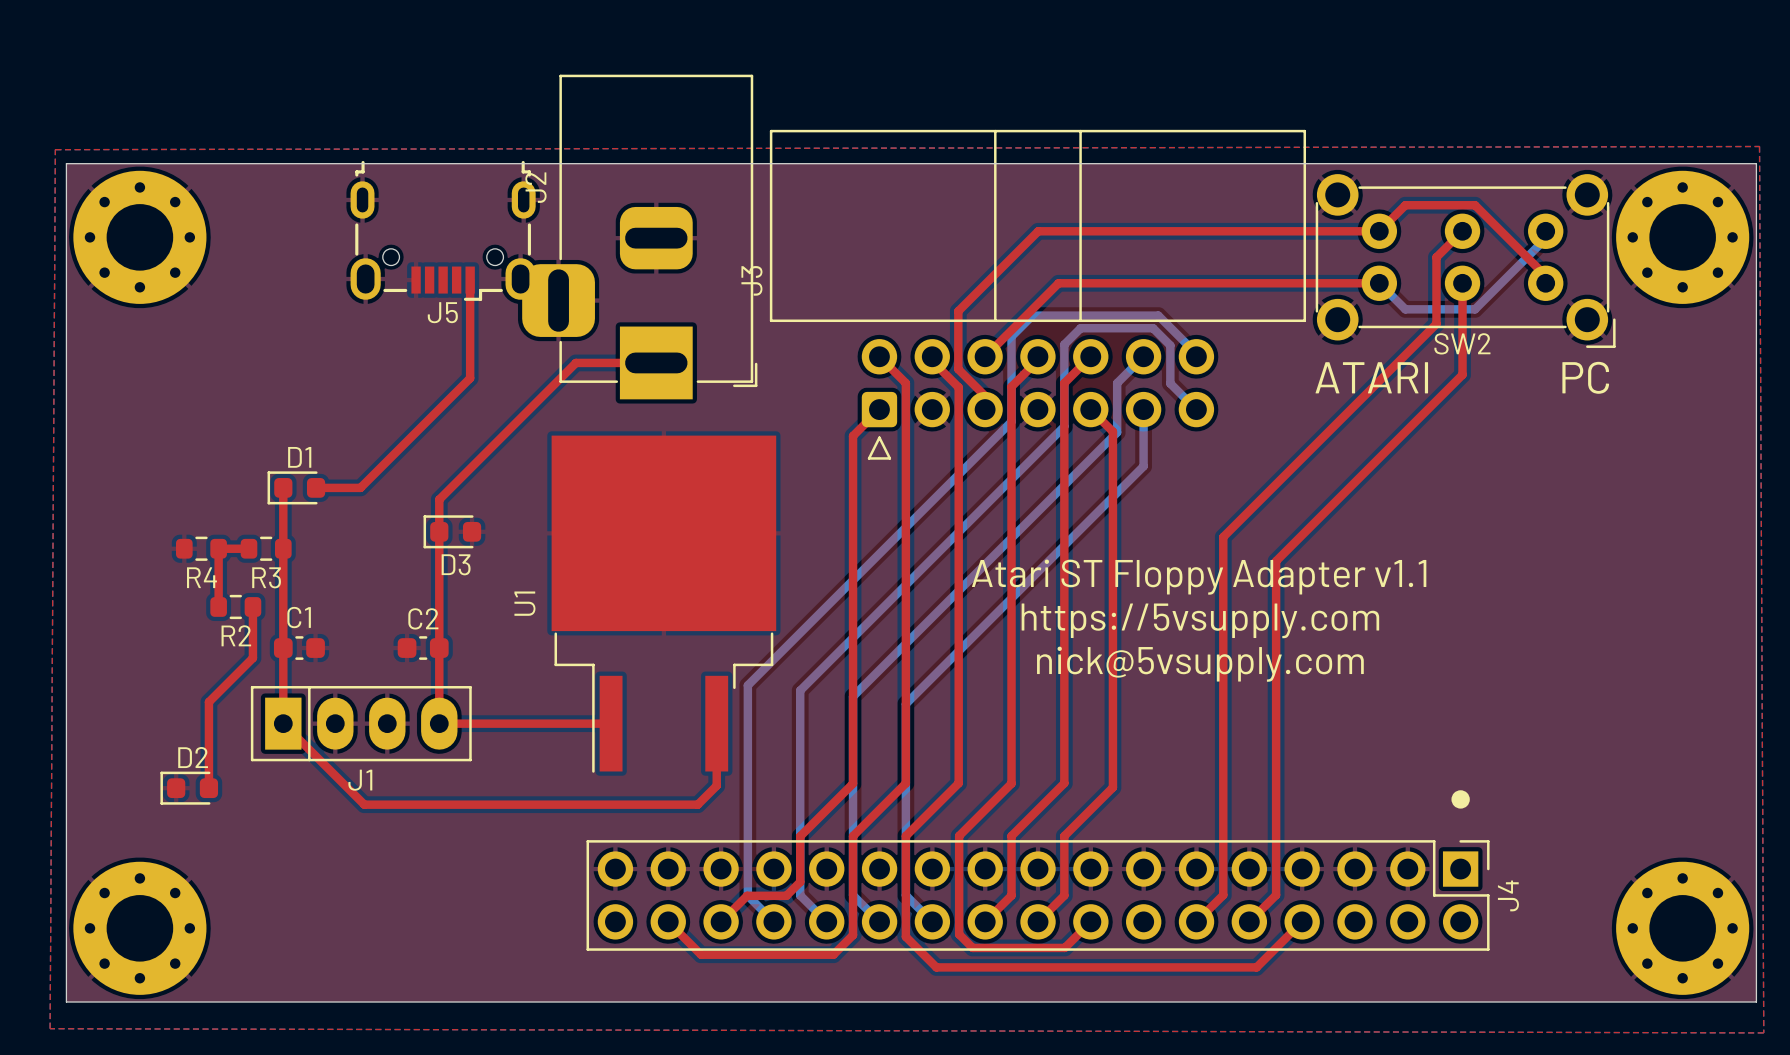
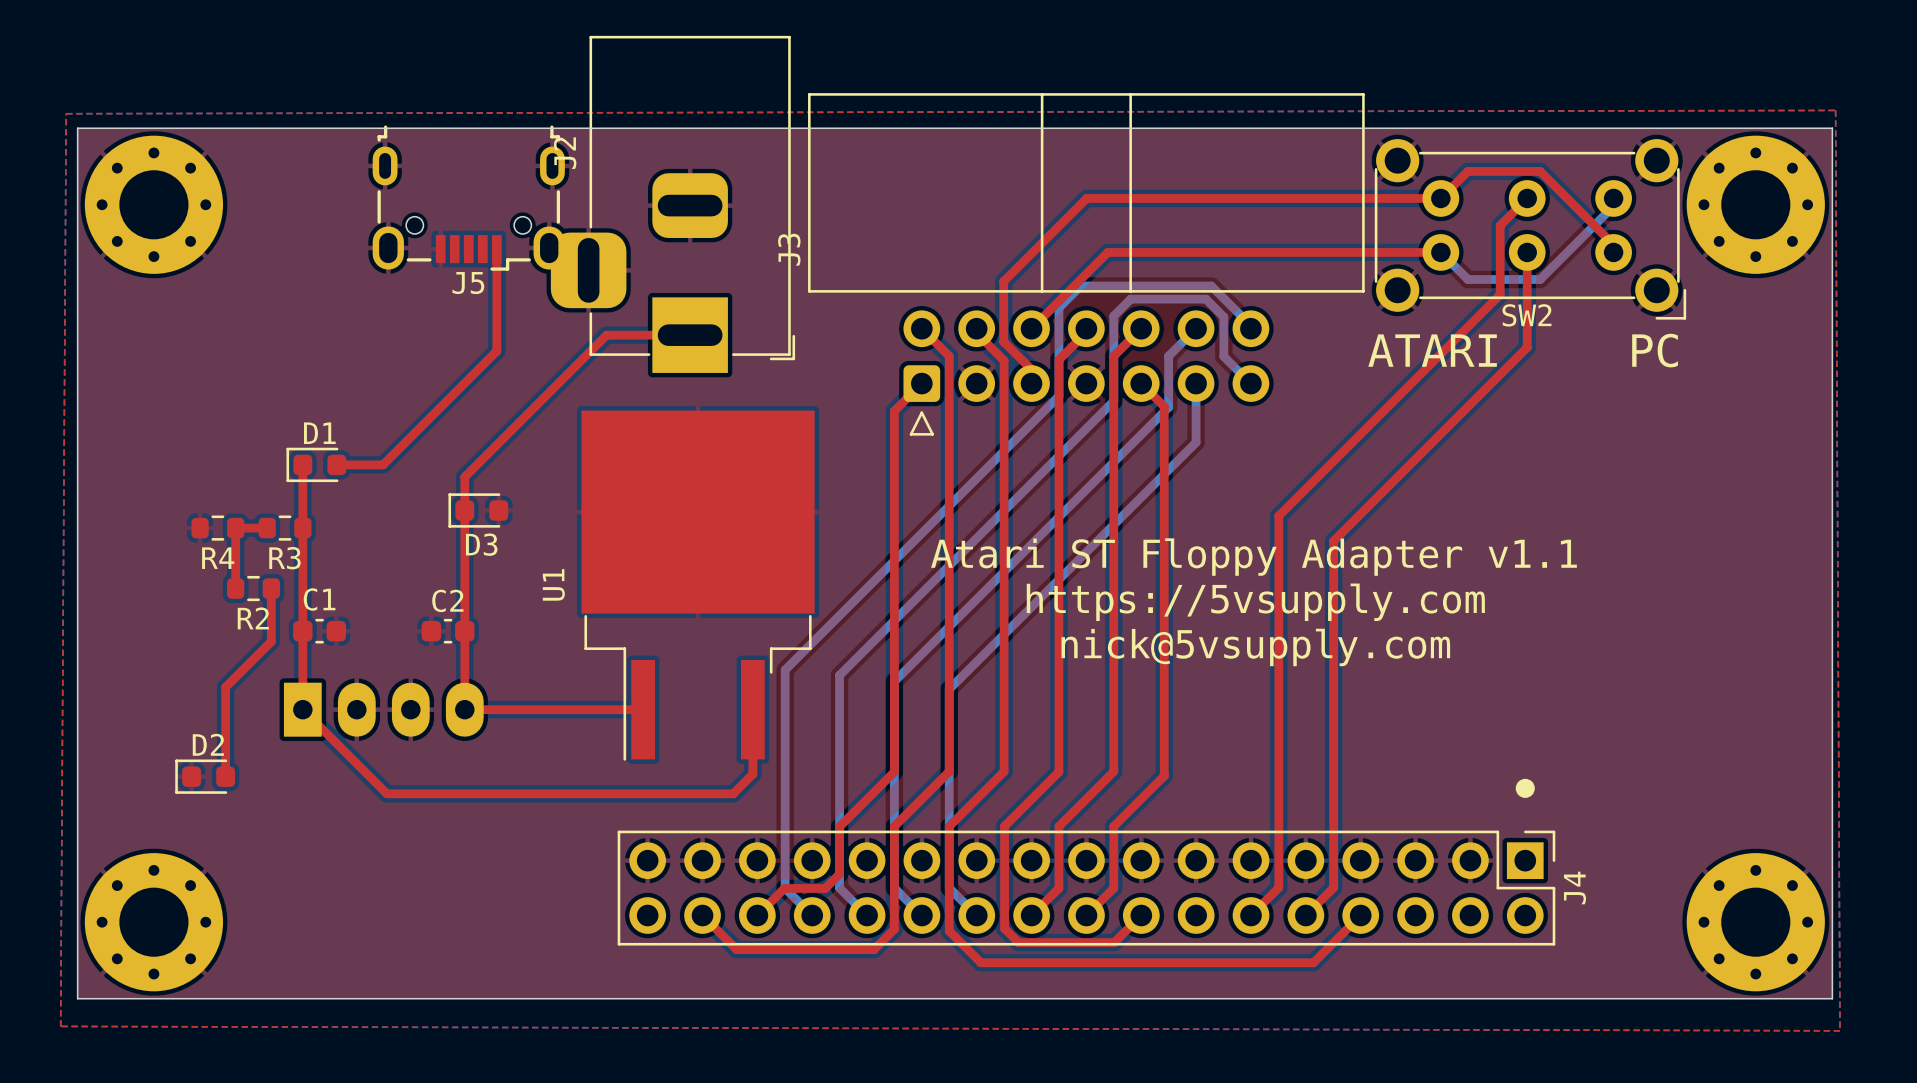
J1 side: top (361, 723) -> bottom (383, 709)

